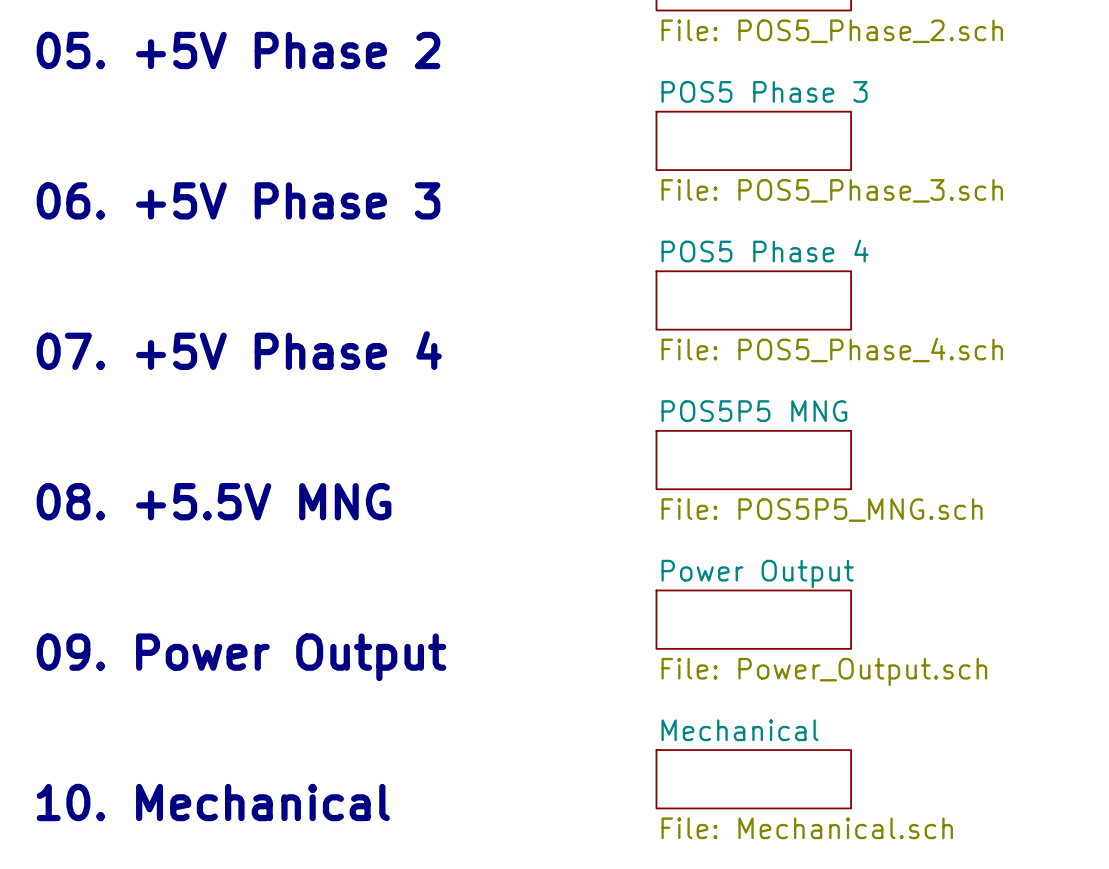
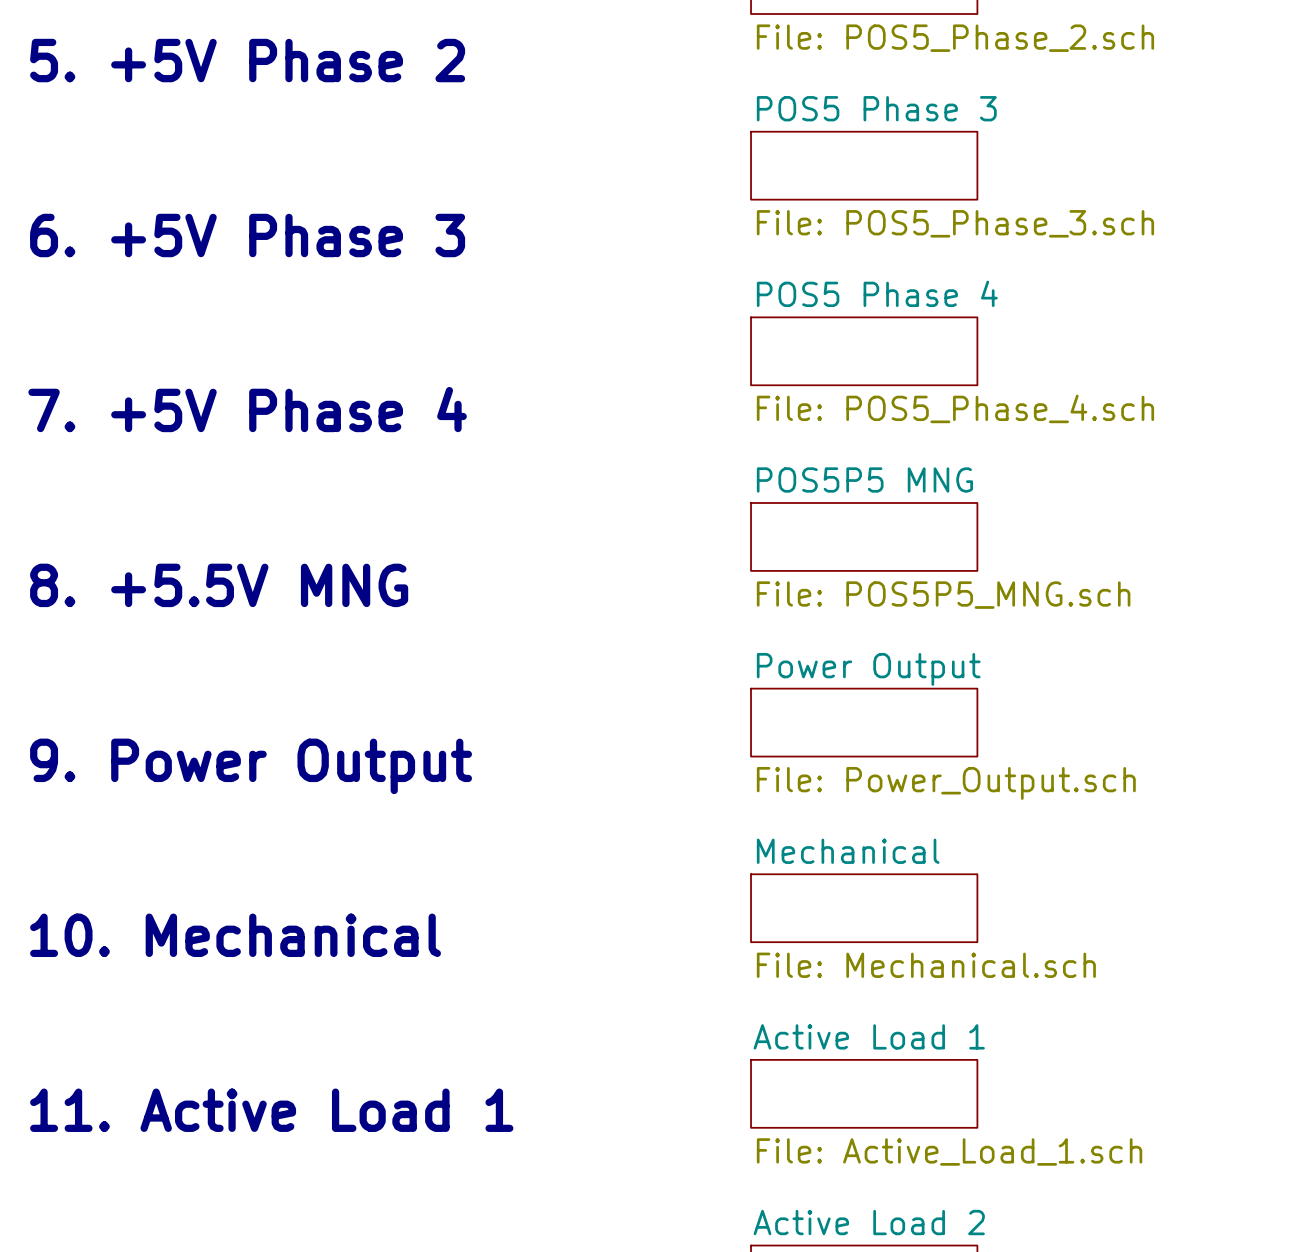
text: 05. +5V Phase 2 (238, 50) -> 5. +5V Phase 2 (247, 60)
text: 06. +5V Phase 3 (238, 200) -> 6. +5V Phase 3 (247, 235)
text: 07. +5V Phase 4 (239, 350) -> 7. +5V Phase 4 (247, 409)
text: 08. +5.5V MNG (214, 501) -> 8. +5.5V MNG (219, 585)
text: 09. Power Output (241, 657) -> 9. Power Output (251, 766)

